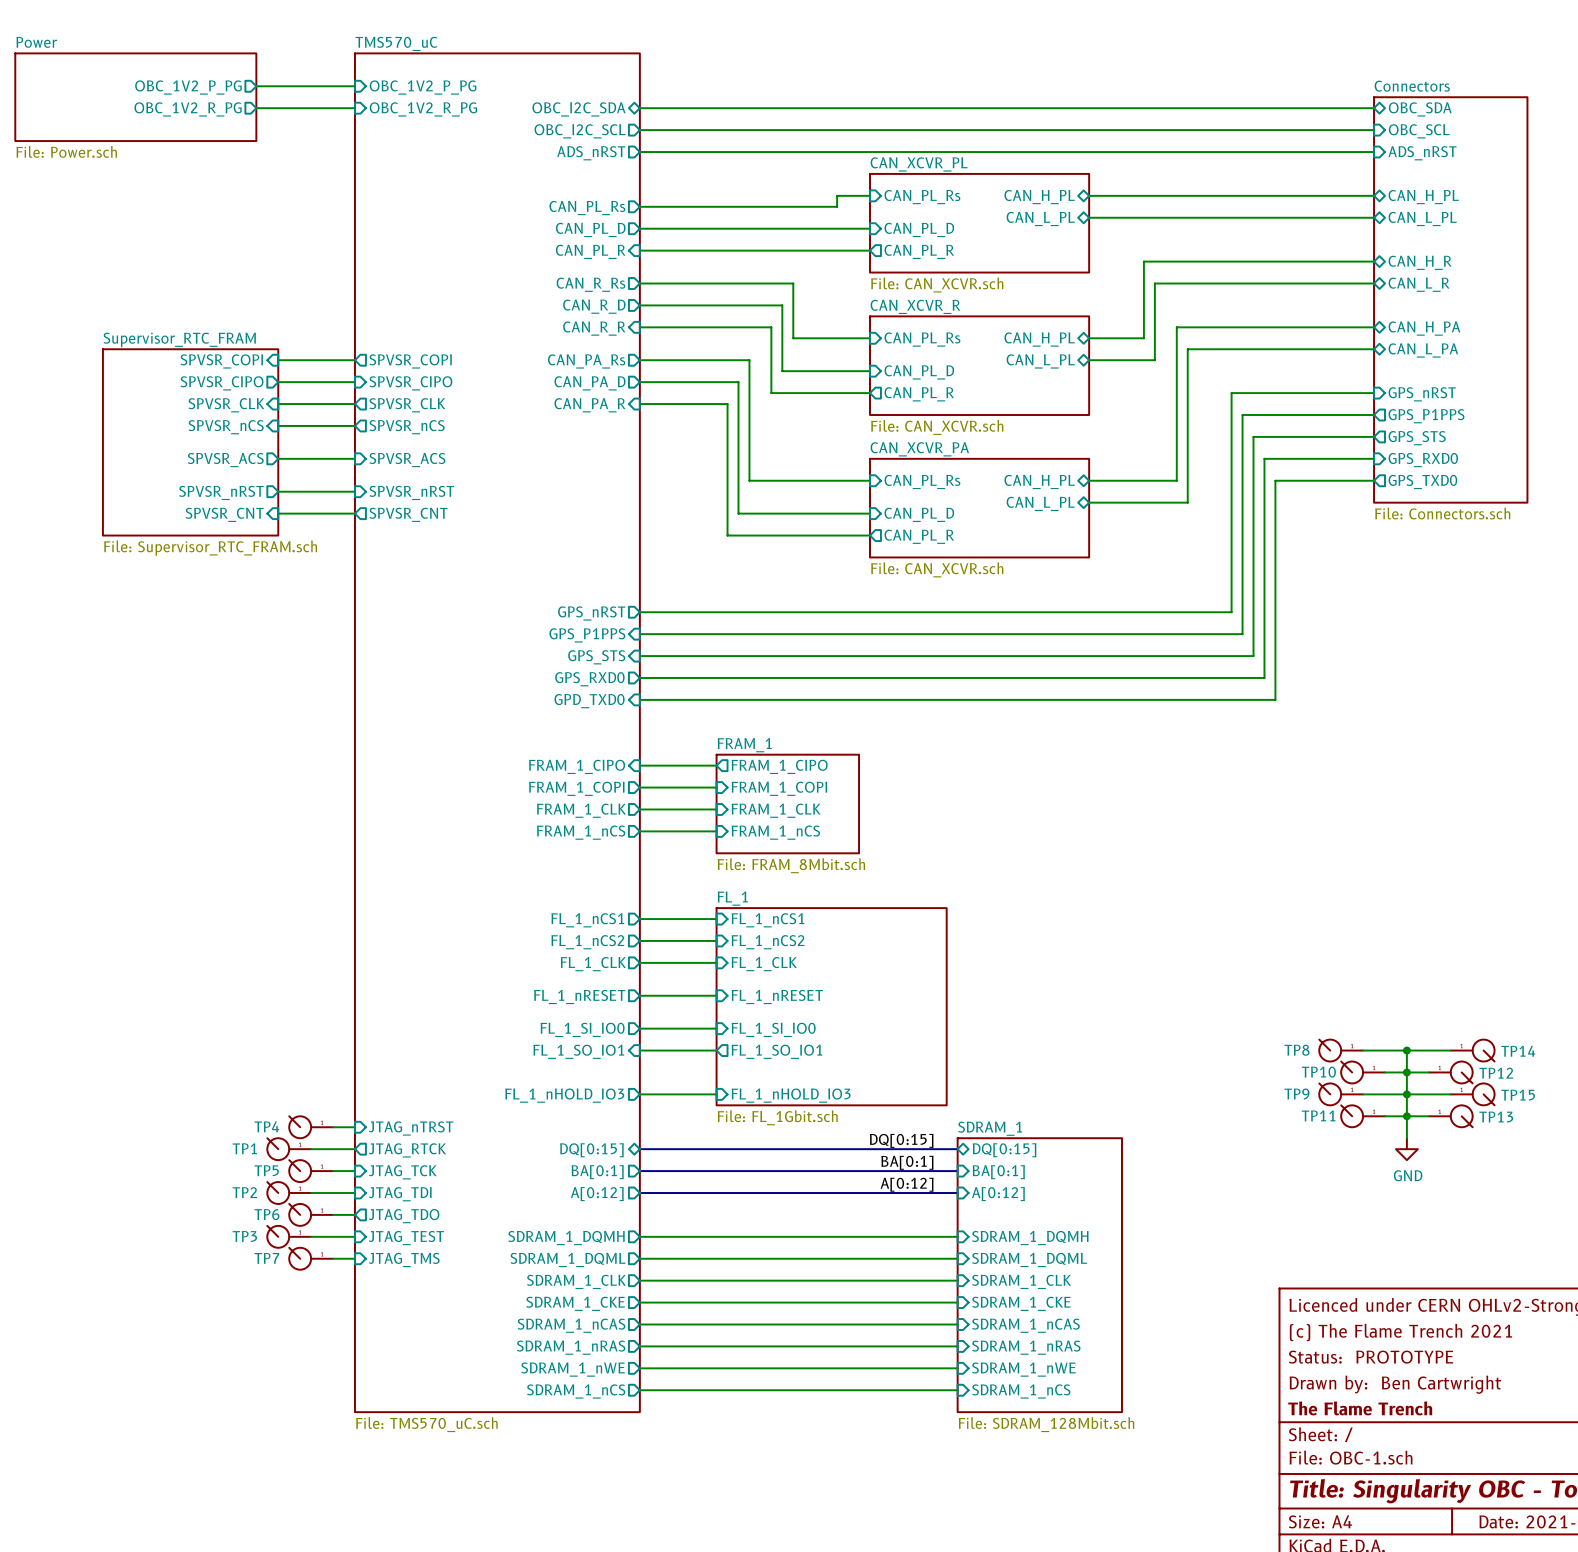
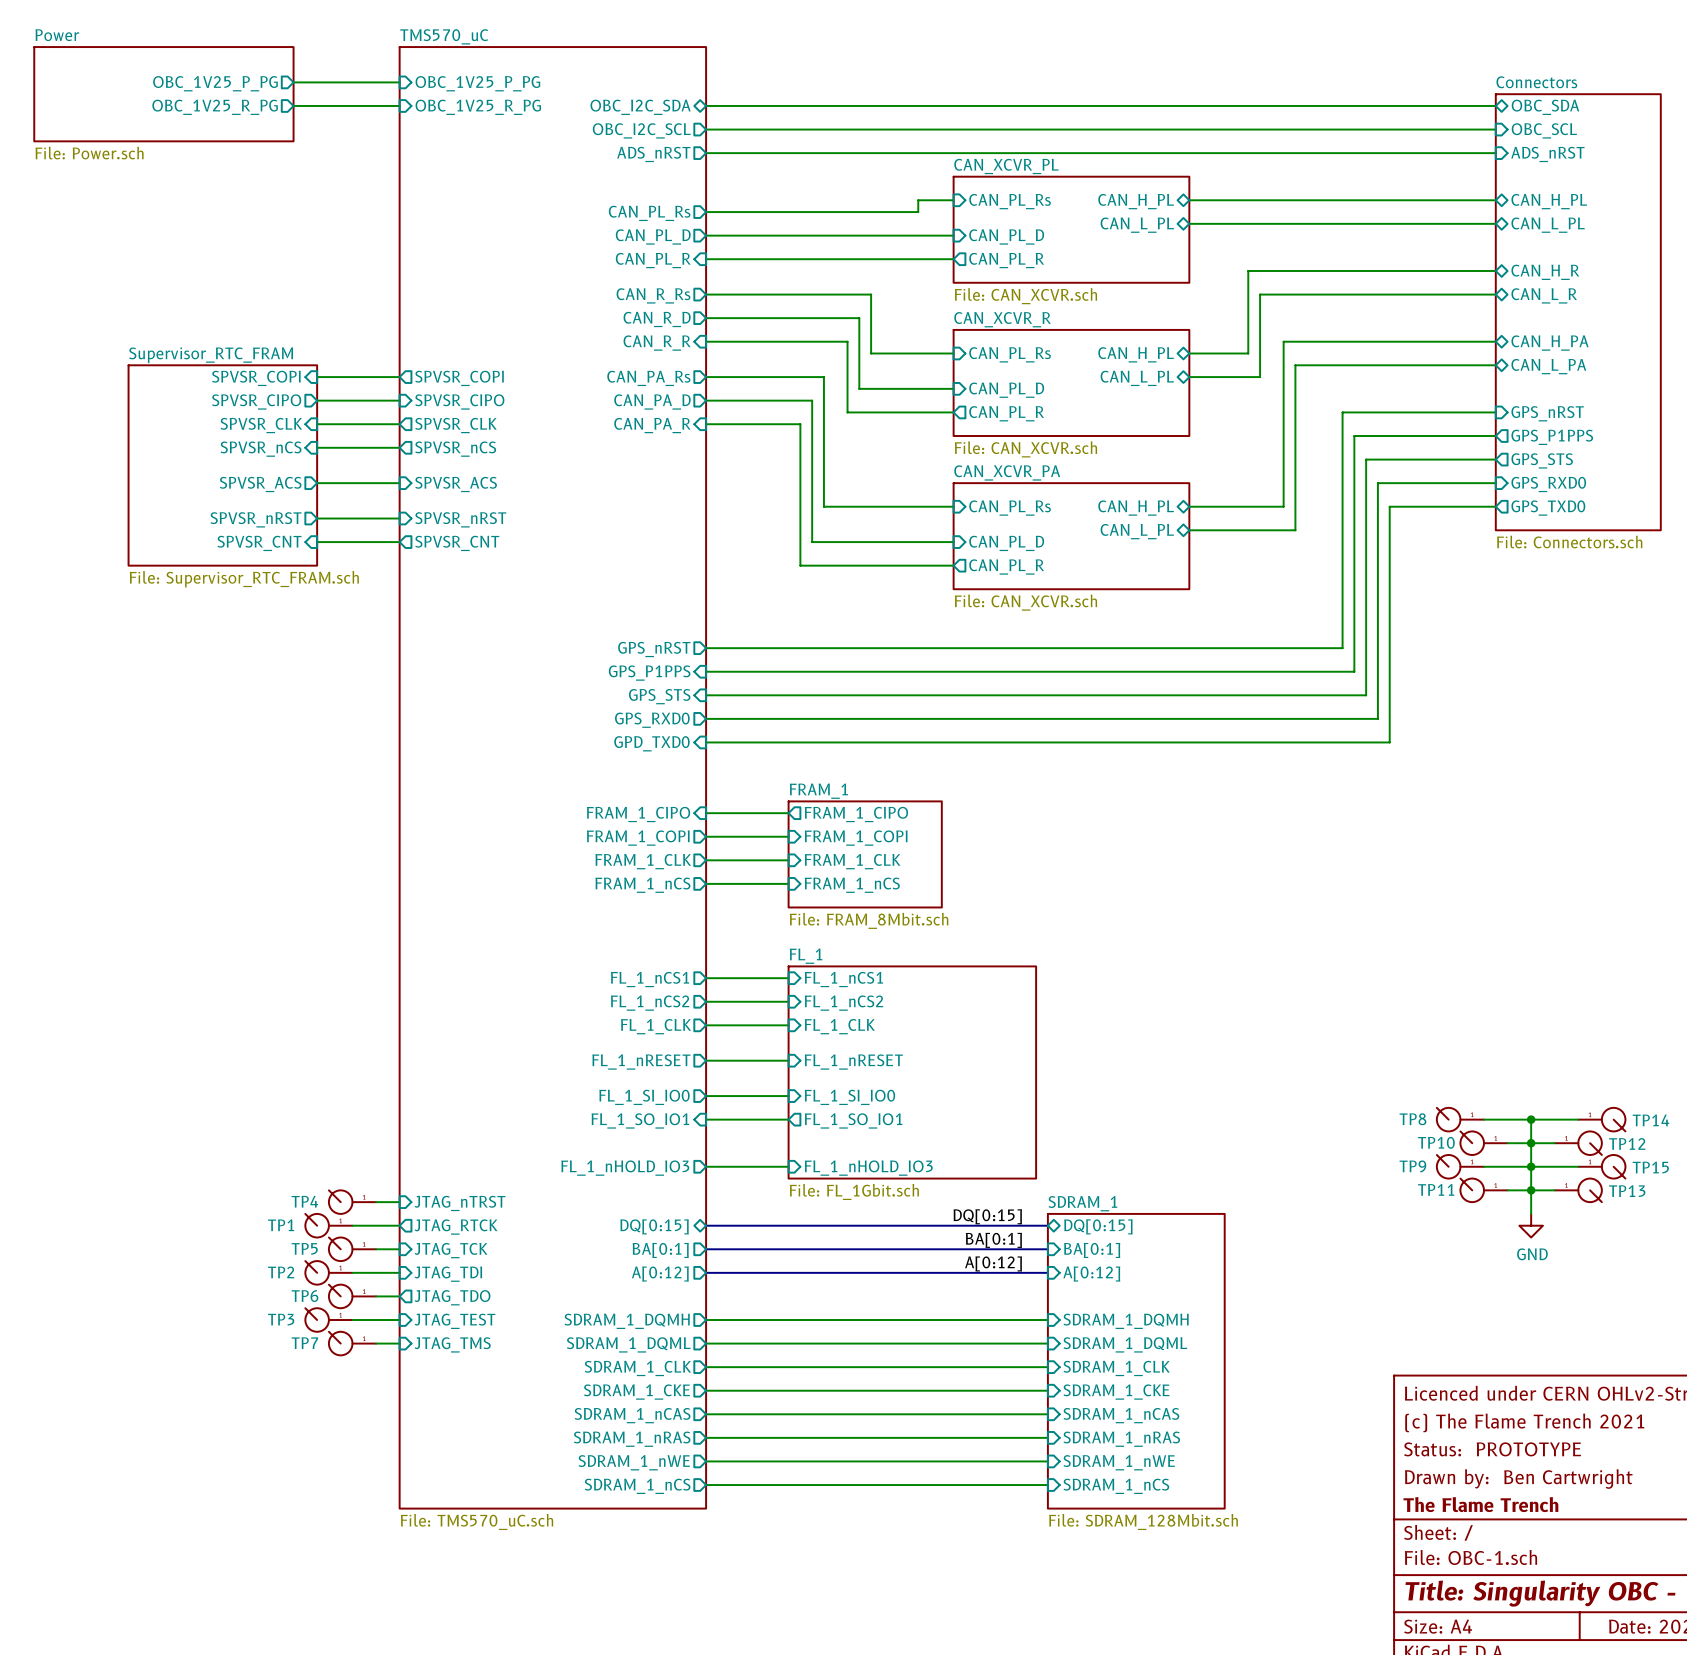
sheet pin: OBC_1V2_P_PG (188, 87) -> OBC_1V25_P_PG (215, 83)
sheet pin: OBC_1V2_P_PG (423, 87) -> OBC_1V25_P_PG (477, 83)
sheet pin: OBC_1V2_R_PG (188, 109) -> OBC_1V25_R_PG (215, 107)
sheet pin: OBC_1V2_R_PG (423, 109) -> OBC_1V25_R_PG (478, 107)

